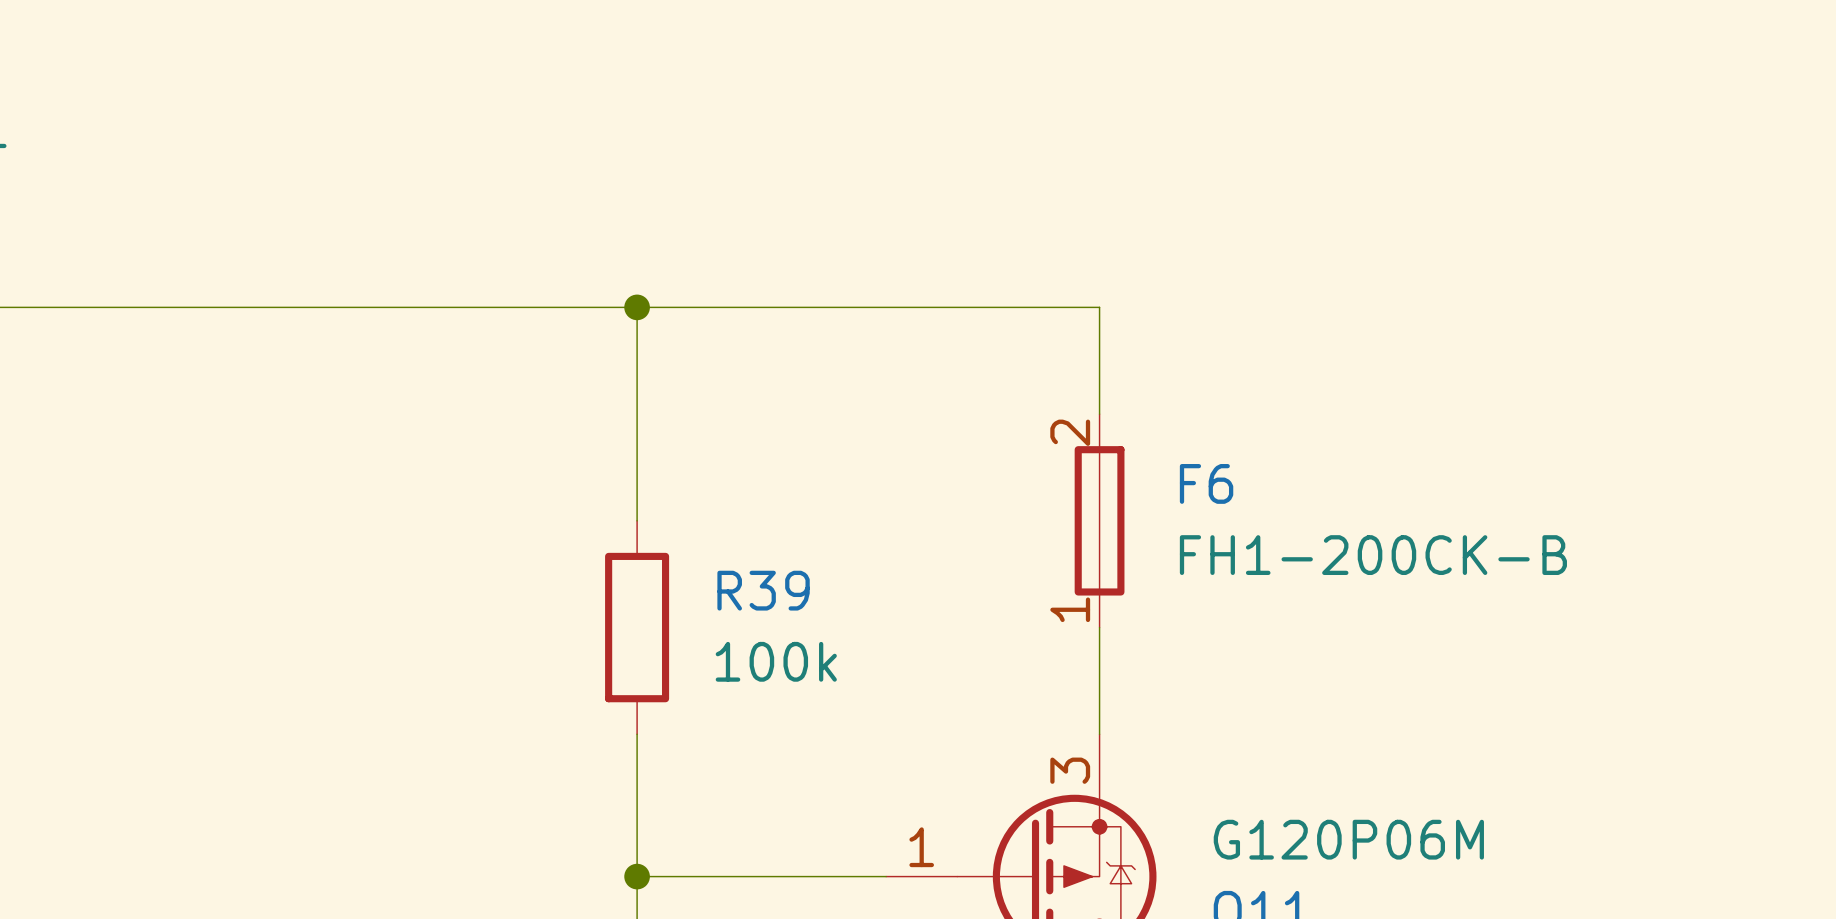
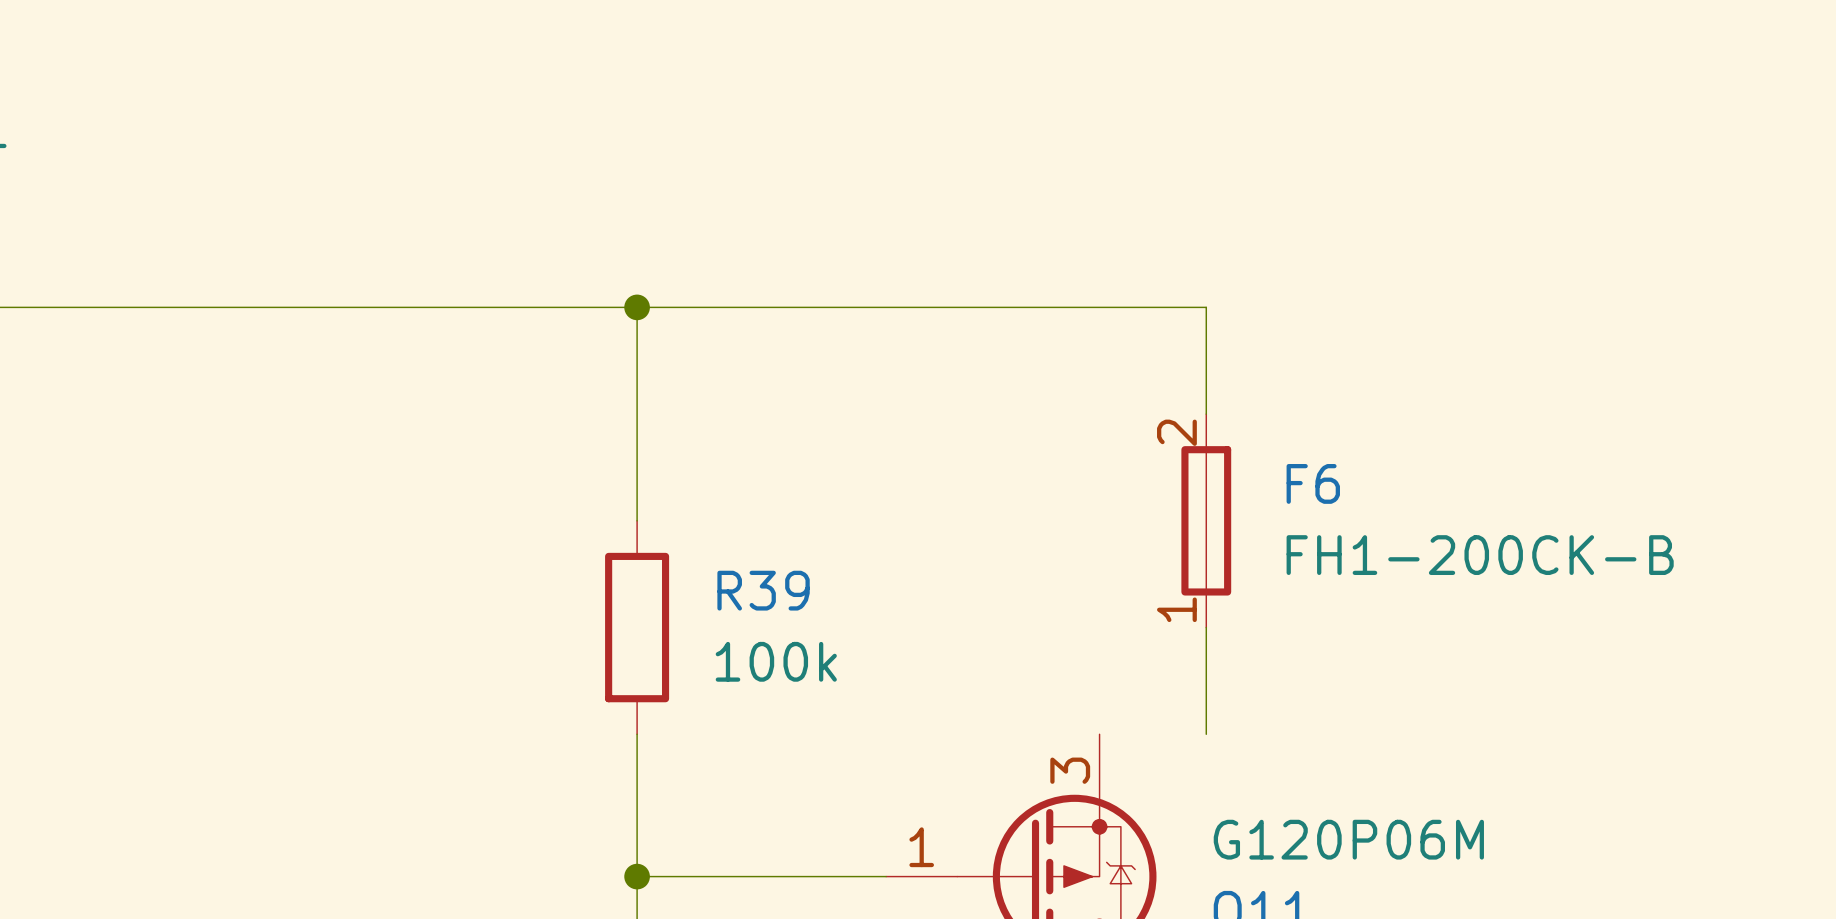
wire: (1099, 307) (1099, 414) -> (1099, 307) (1206, 307) (1206, 414)
F6 position: (1099, 520) -> (1206, 520)
wire: (1099, 627) (1099, 734) -> (1206, 627) (1206, 734)

